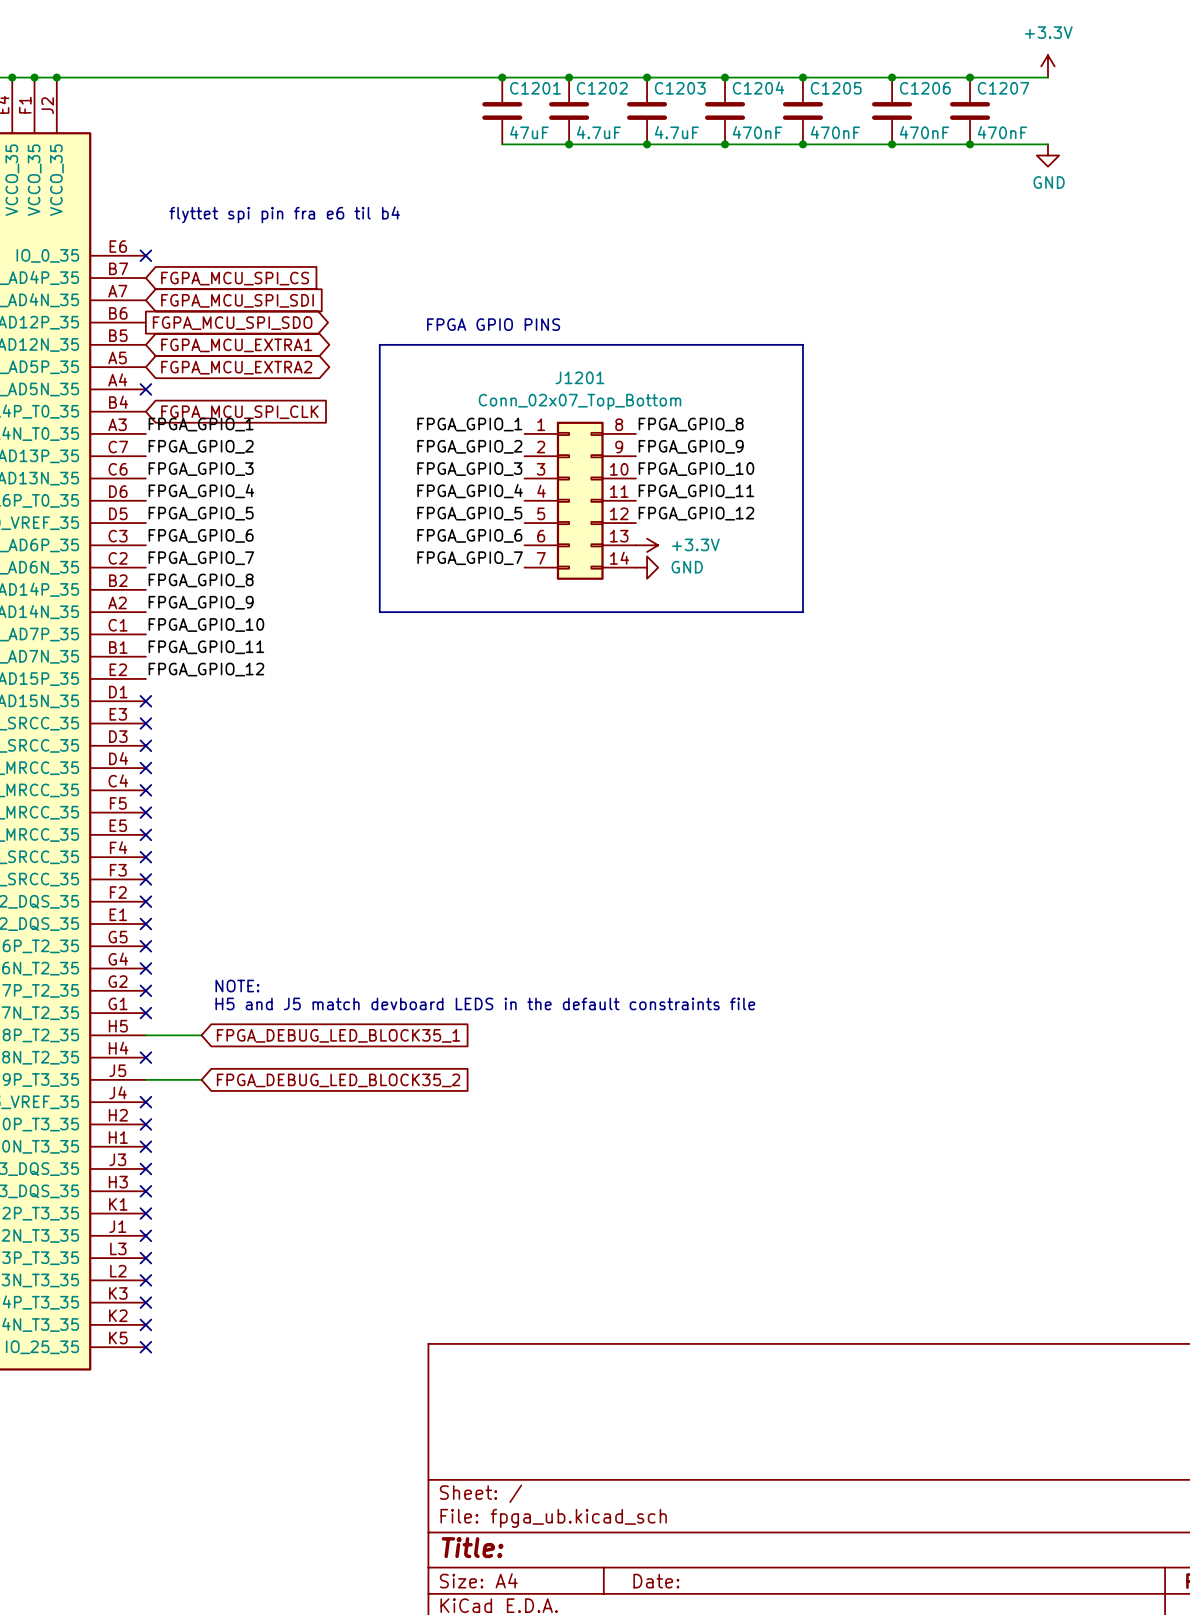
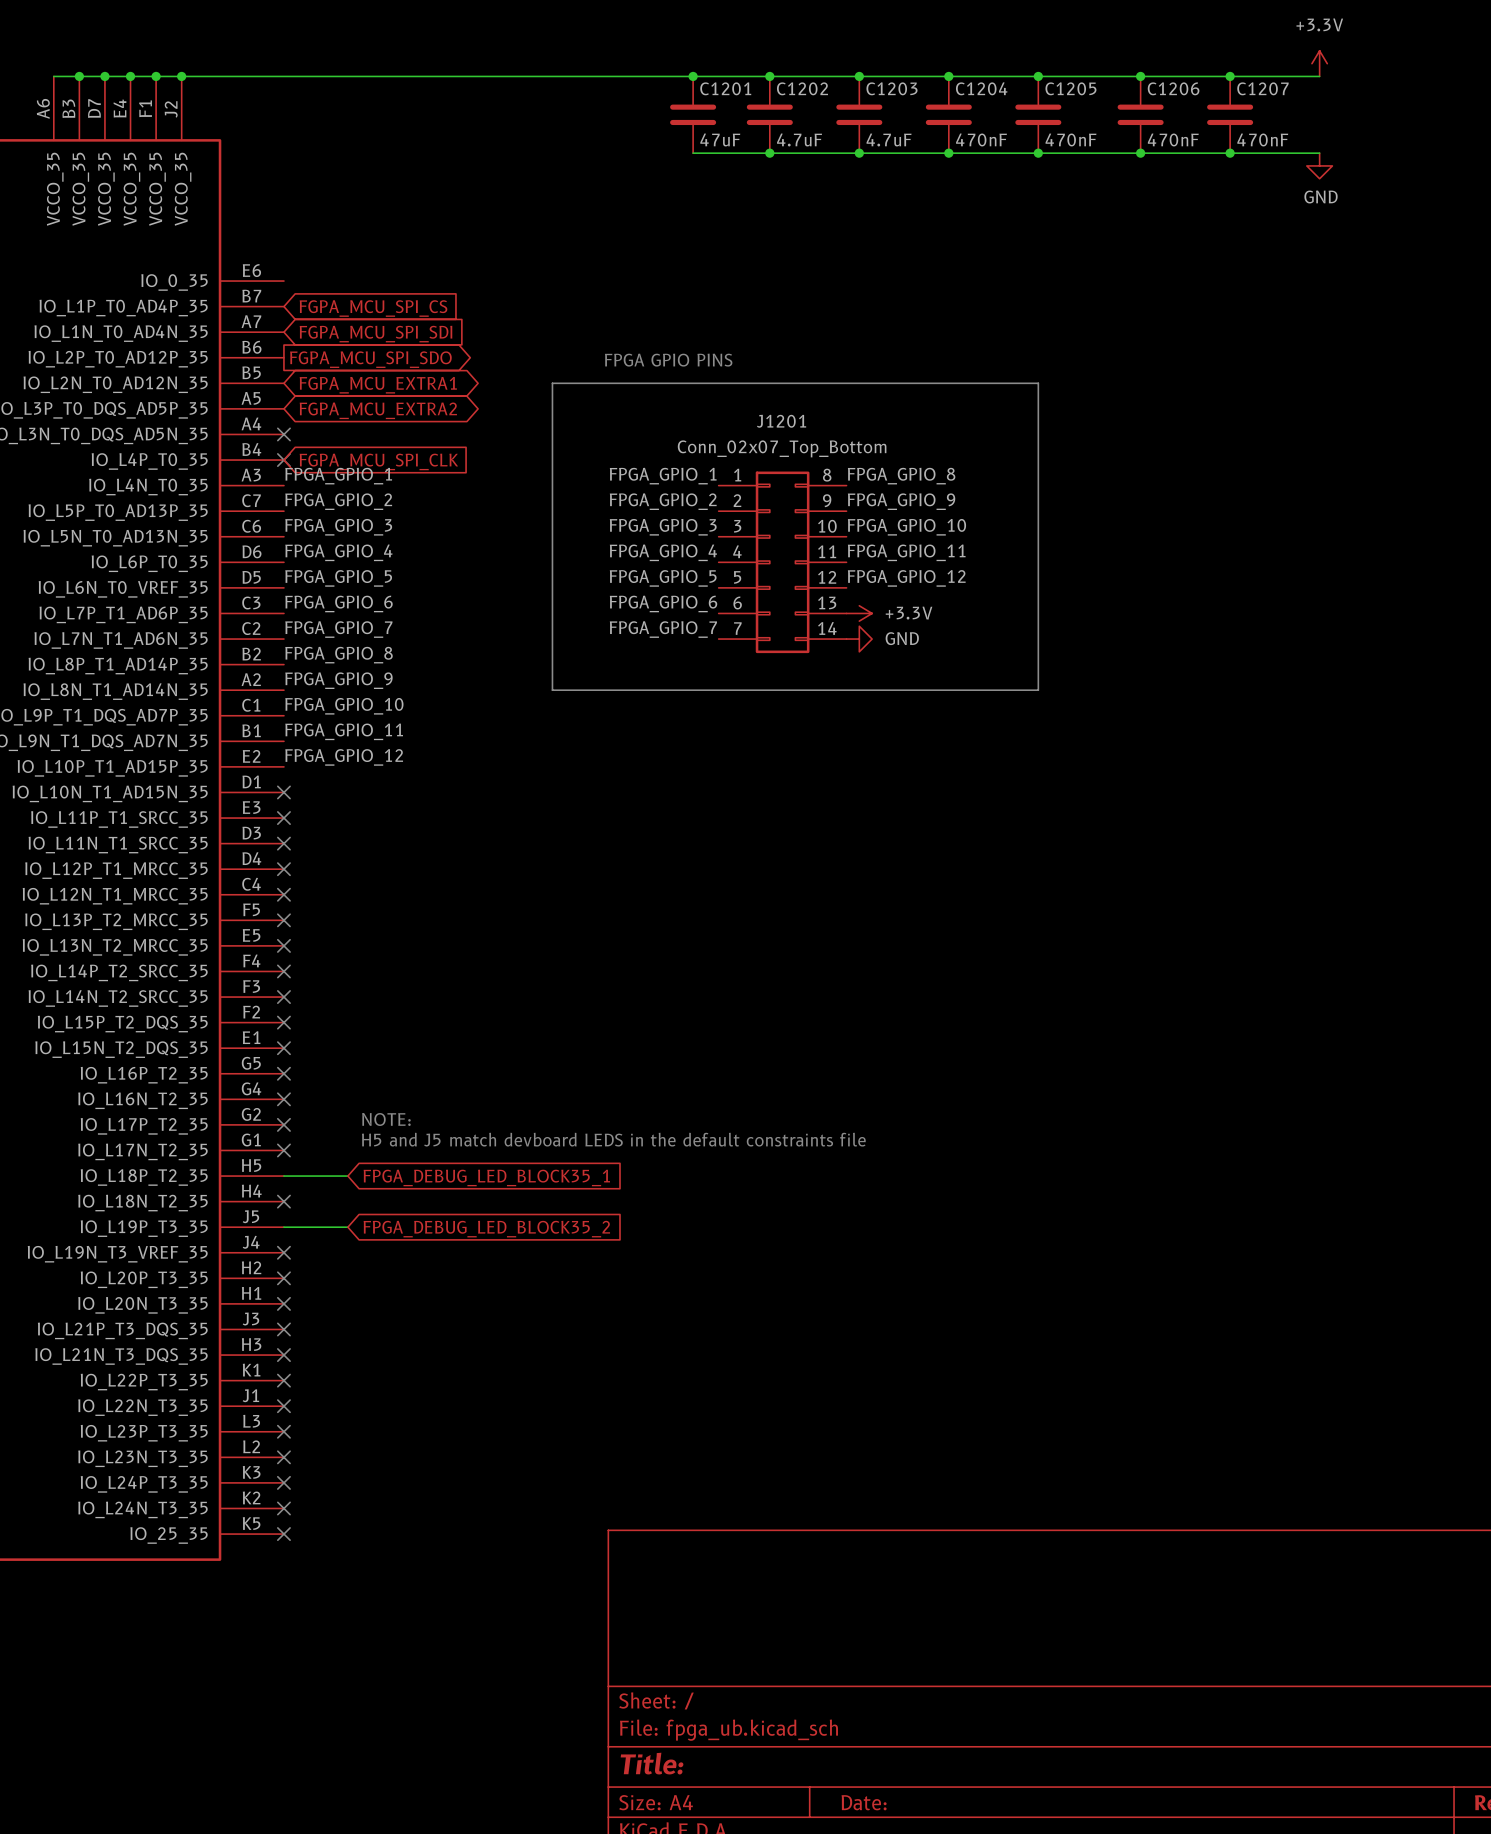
text: flyttet spi pin fra e6 til b4 (284, 214) -> none
no-connect mark: (145, 255) -> none
no-connect mark: none -> (283, 460)

